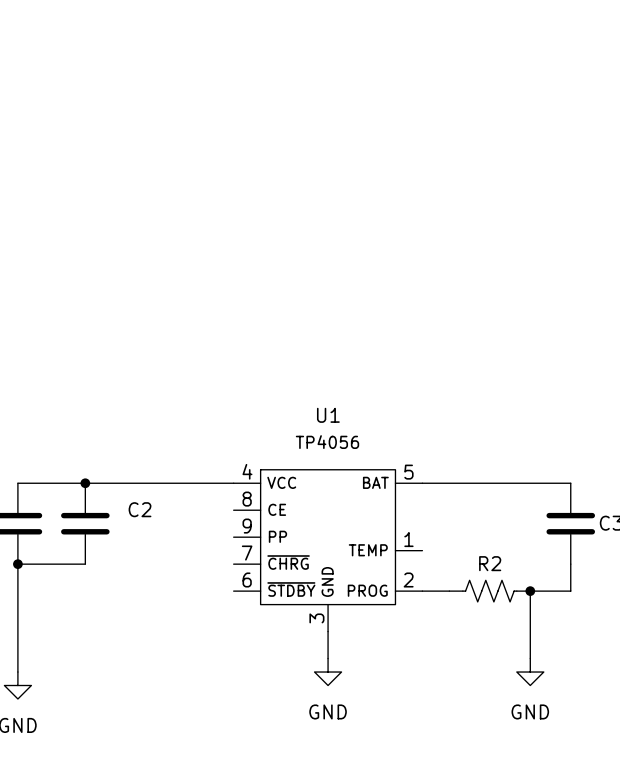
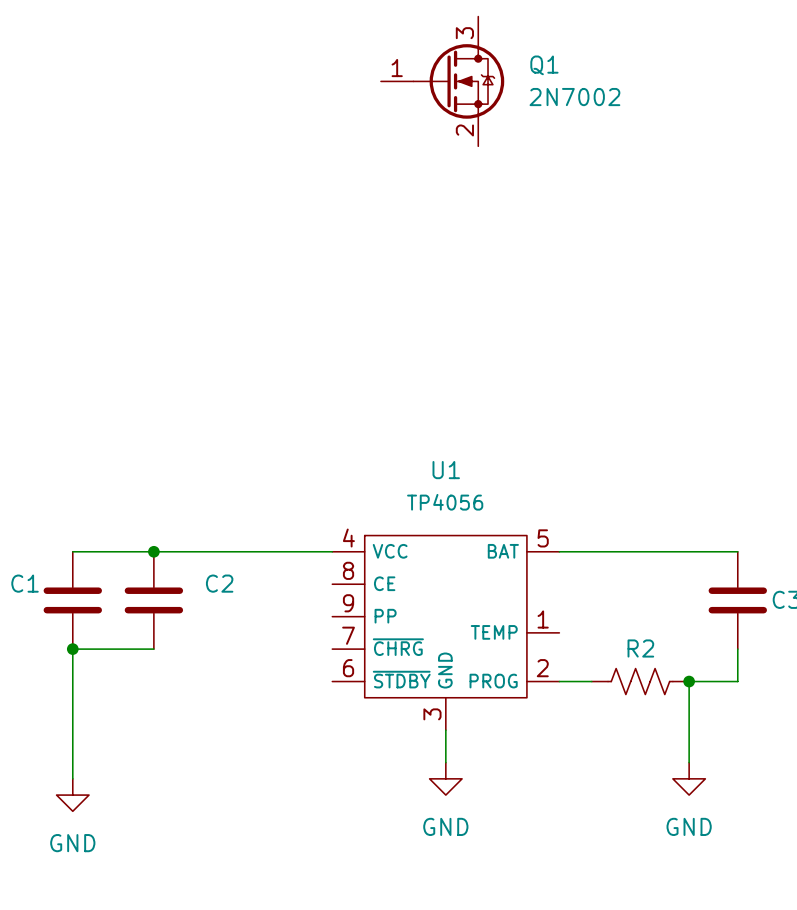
Q1: none -> 2N7002 (442, 81)

